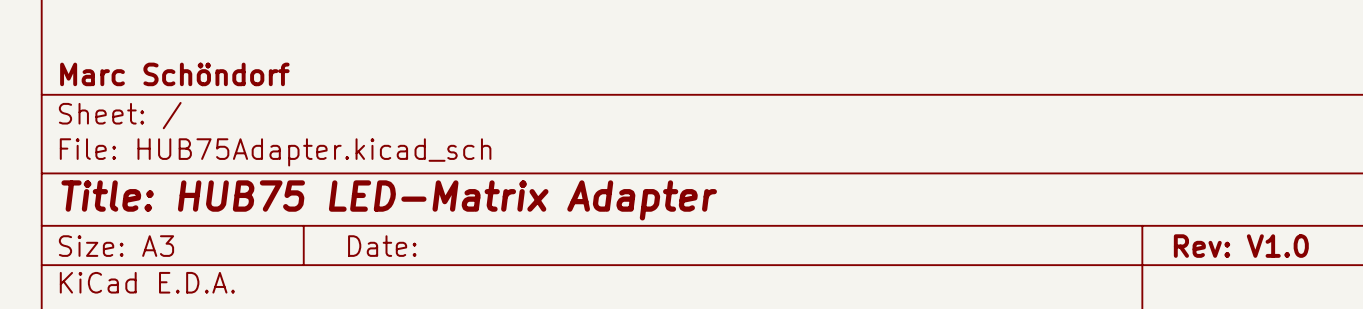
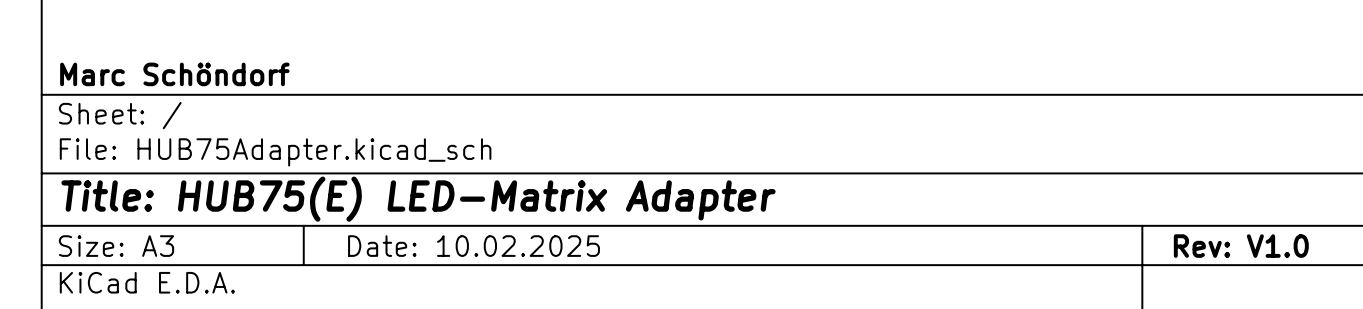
title block: Title: HUB75 LED-Matrix Adapter (389, 200) -> Title: HUB75(E) LED-Matrix Adapter (418, 199)
title block: Date: (382, 246) -> Date: 10.02.2025 (474, 246)

